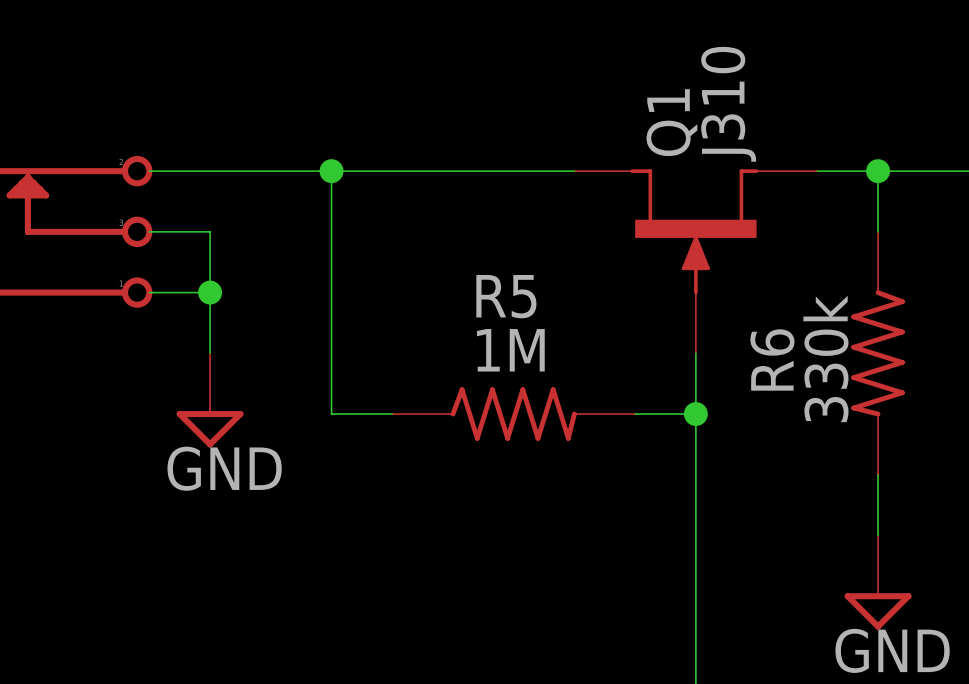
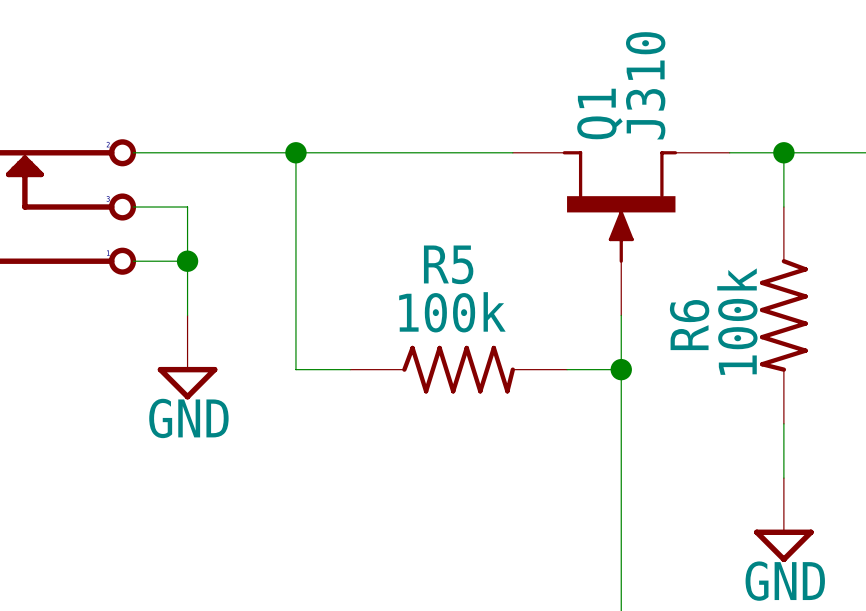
R5 value: 1M (510, 350) -> 100k (452, 312)
R6 value: 330k (825, 358) -> 100k (737, 321)

